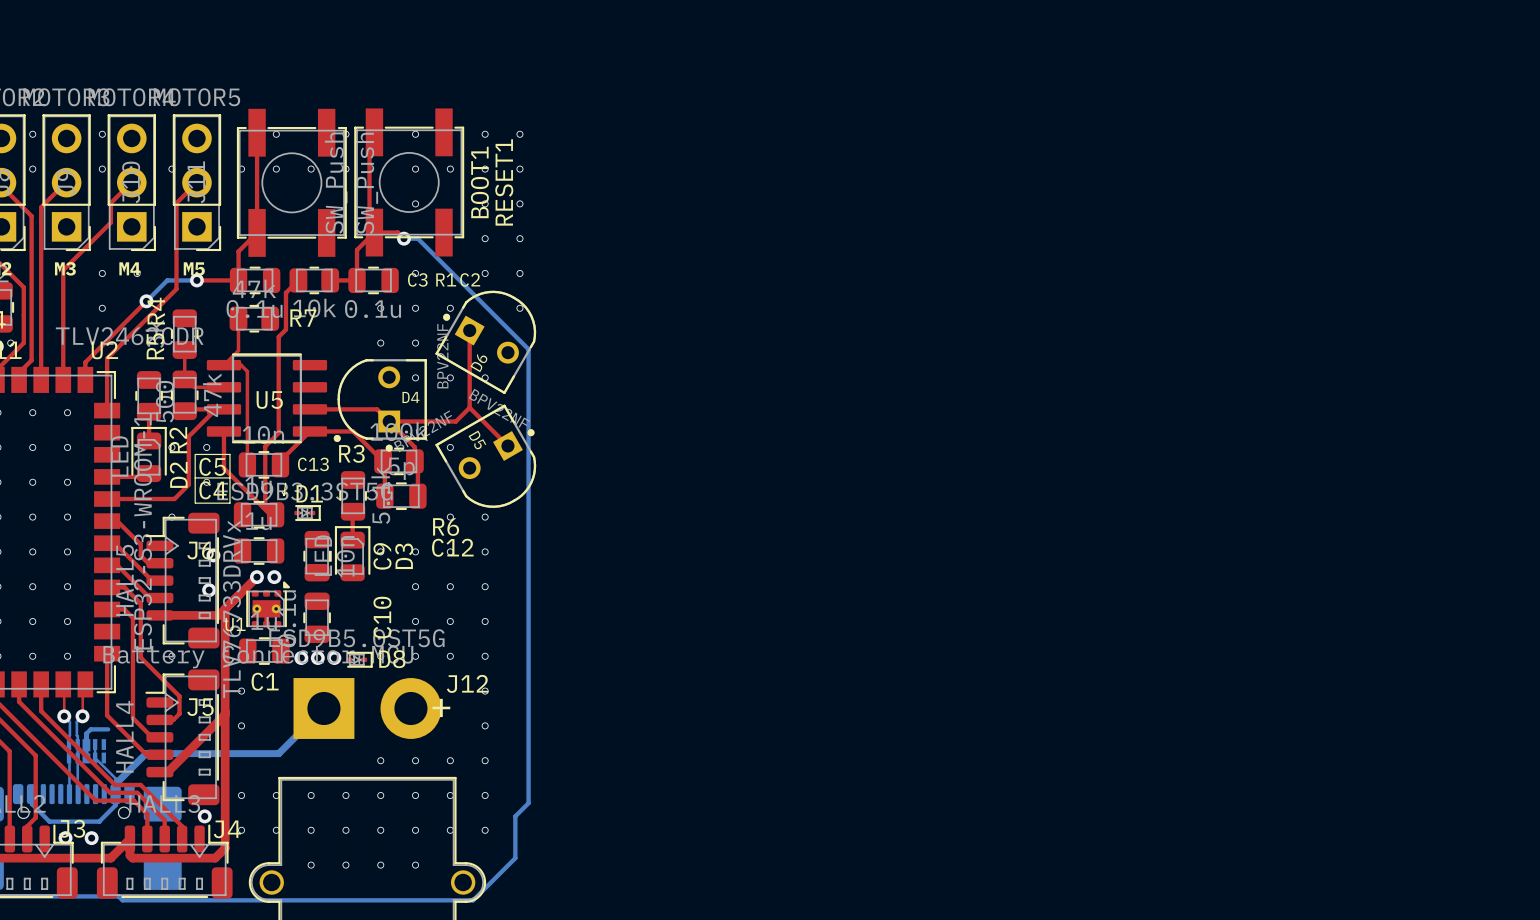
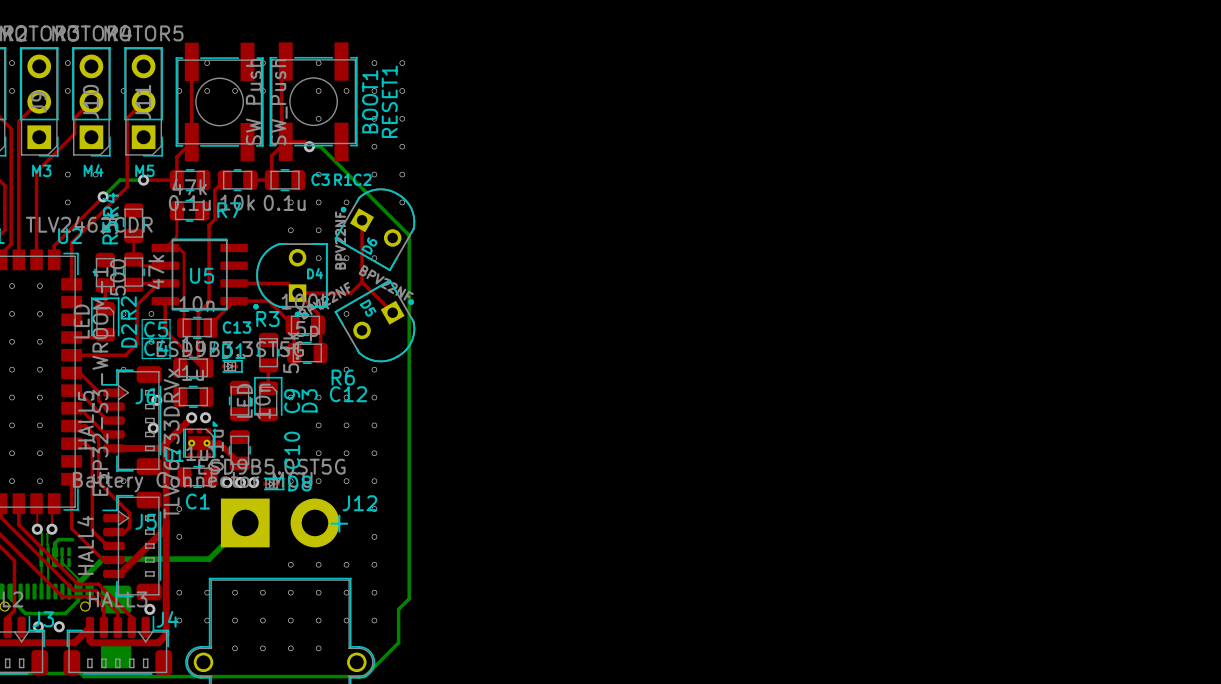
top track: none -> (206, 443) (219, 443) (239, 463)

